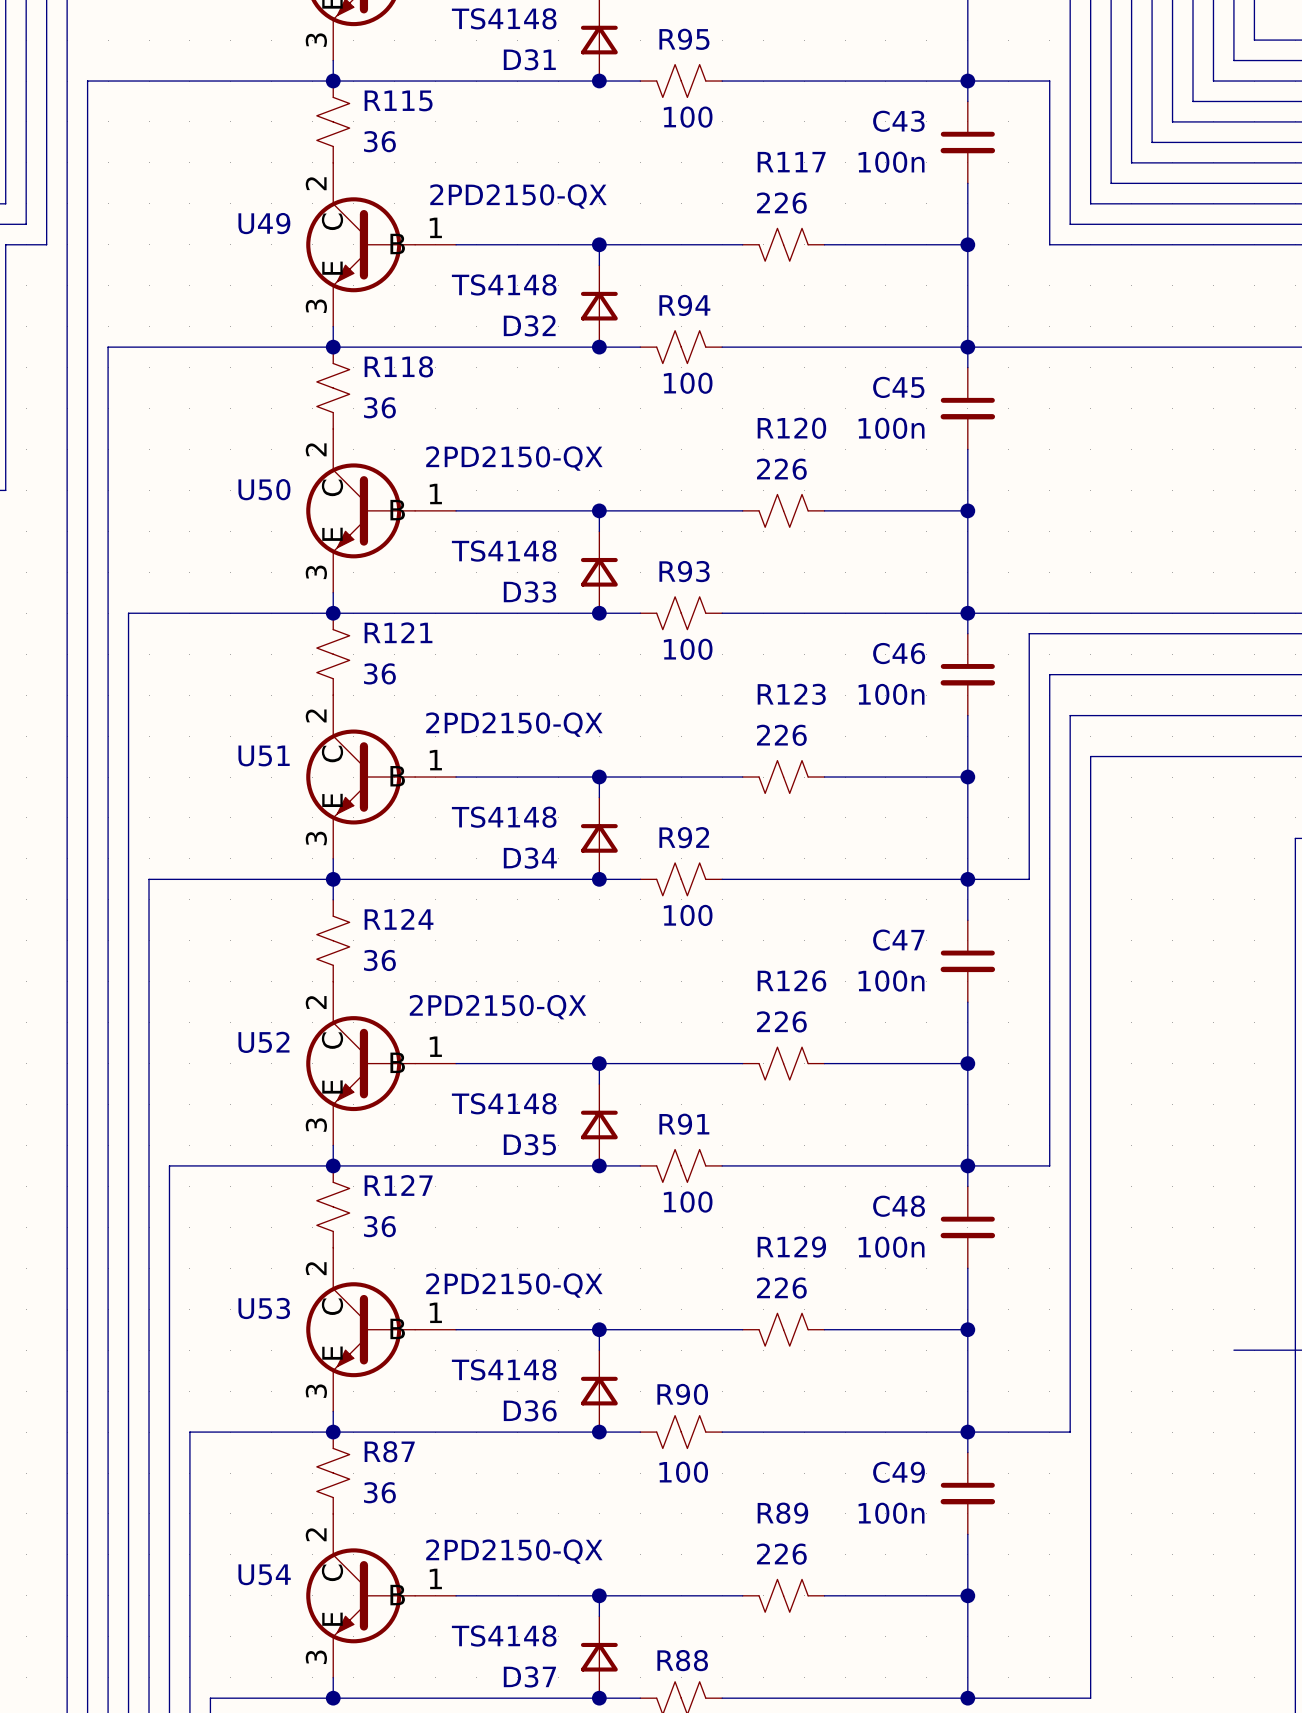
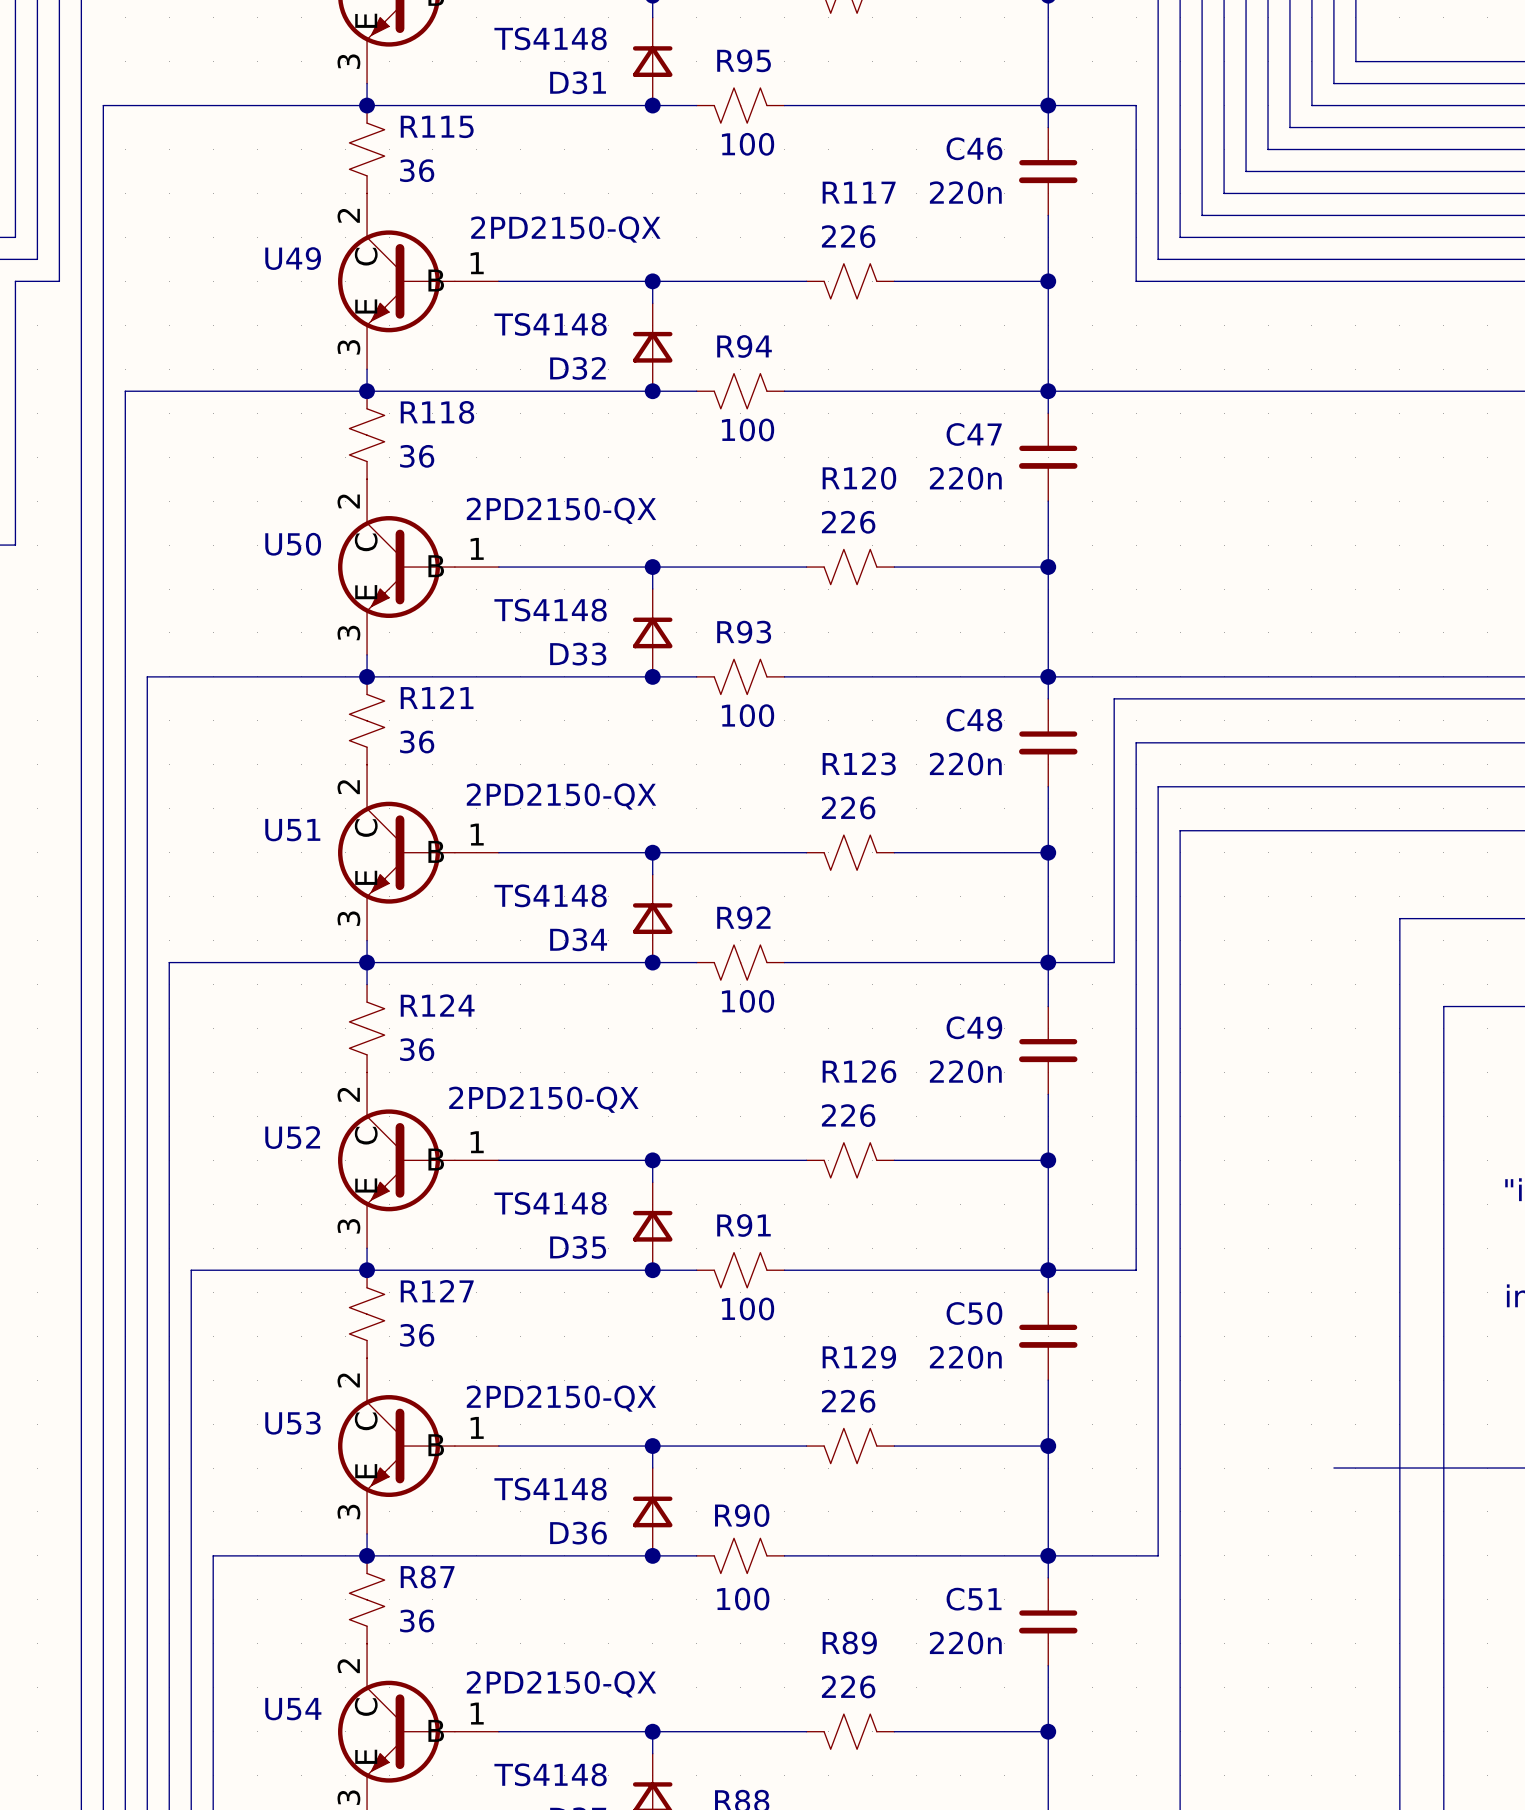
C43 name: C43 (898, 121) -> C46 (974, 148)
C43 value: 100n (891, 162) -> 220n (965, 192)
C45 name: C45 (898, 387) -> C47 (974, 434)
C45 value: 100n (891, 428) -> 220n (965, 478)
C46 name: C46 (899, 653) -> C48 (974, 720)
C46 value: 100n (891, 694) -> 220n (965, 764)
C47 name: C47 (898, 940) -> C49 (974, 1027)
C47 value: 100n (891, 981) -> 220n (965, 1071)
C48 name: C48 (899, 1206) -> C50 (974, 1313)
C48 value: 100n (891, 1247) -> 220n (965, 1357)
C49 name: C49 (899, 1472) -> C51 (974, 1599)
C49 value: 100n (891, 1513) -> 220n (965, 1643)

